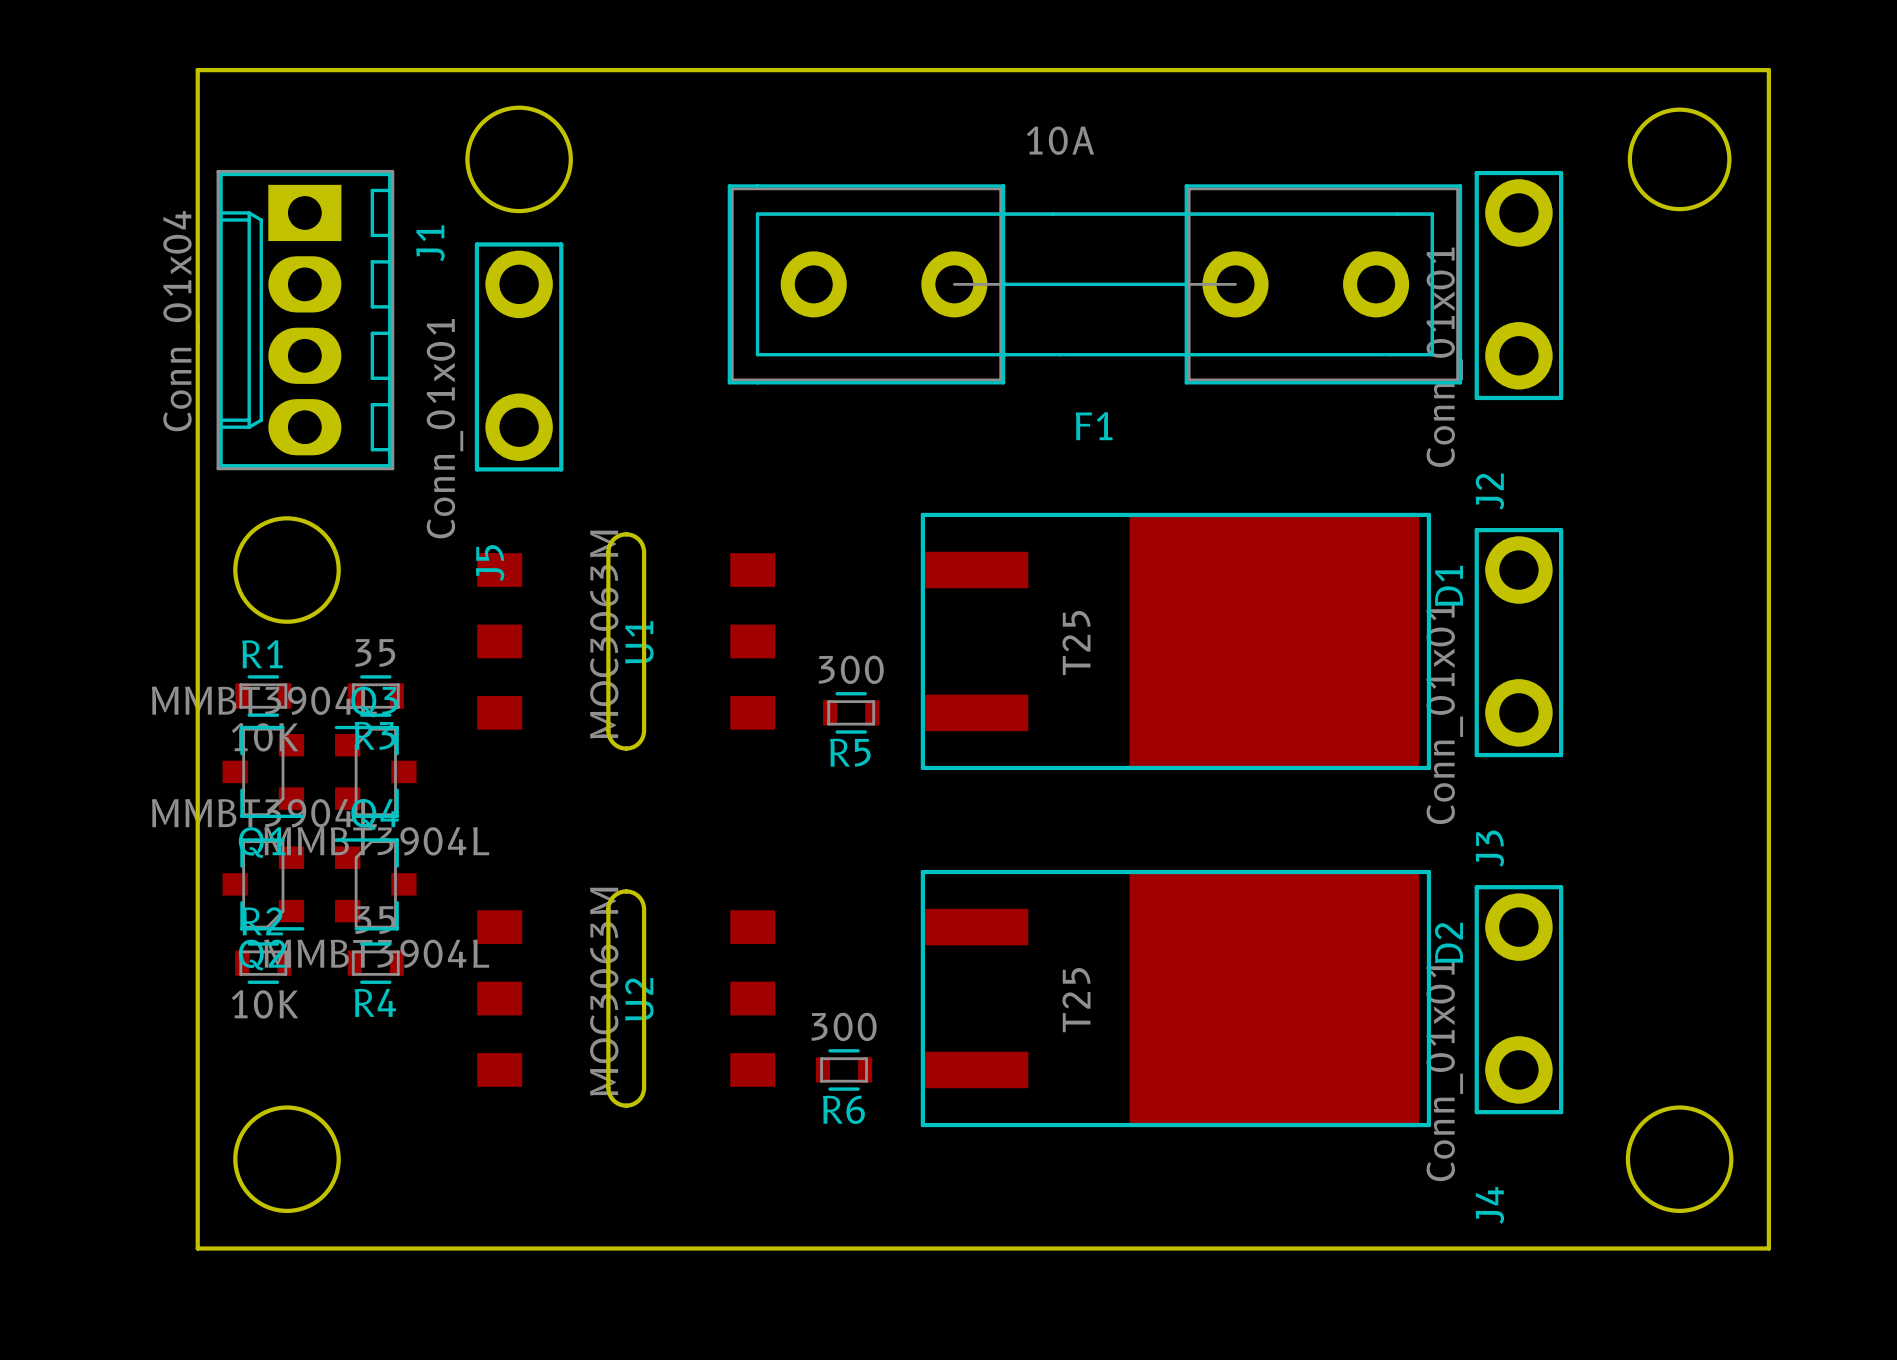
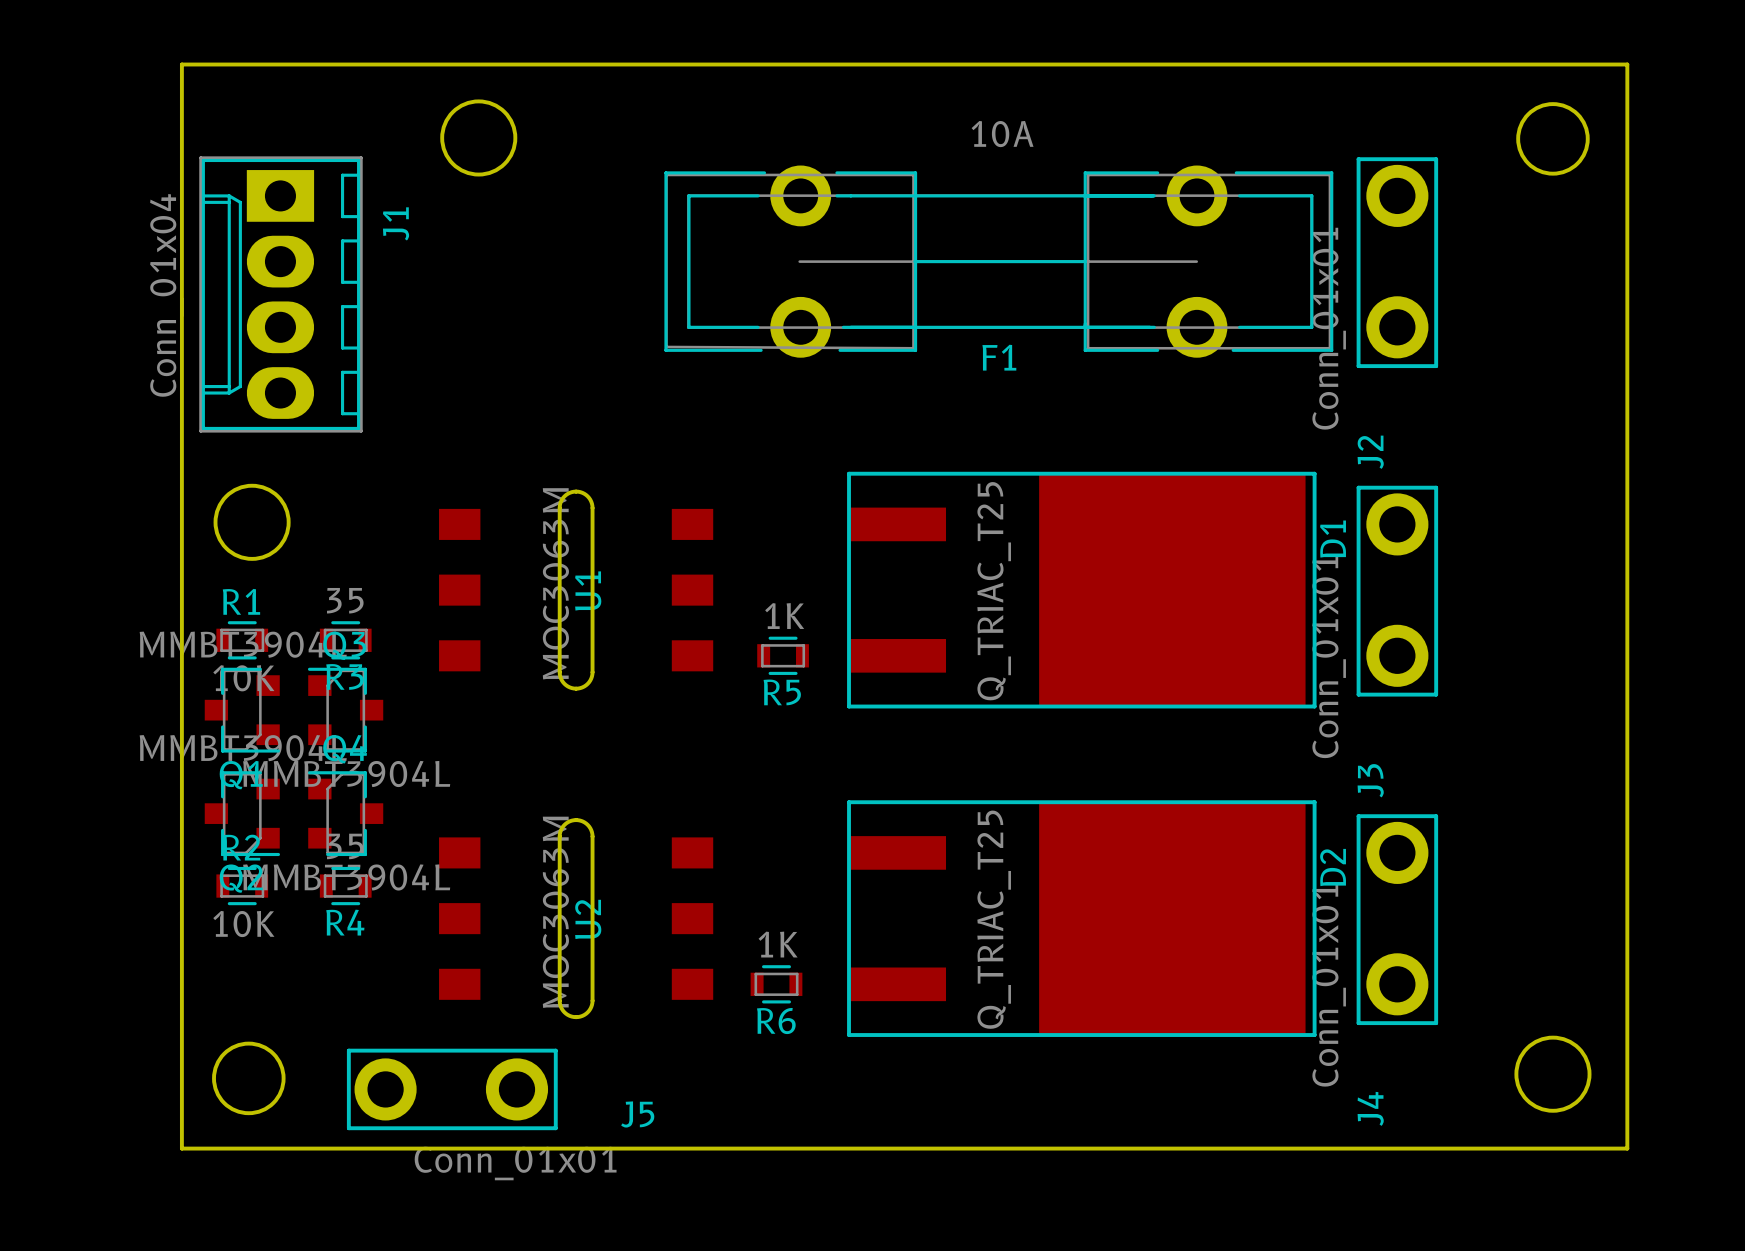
round board edge size: [465, 105, 573, 214] -> [440, 99, 518, 177]
round board edge size: [1627, 107, 1732, 212] -> [1516, 102, 1590, 176]
F1 footprint: [727, 184, 1463, 385] -> [664, 165, 1334, 358]
J5 rotation: 0° (519, 356) -> 90° counterclockwise (452, 1089)
J5 position: (519, 356) -> (452, 1089)
round board edge size: [233, 516, 341, 624] -> [213, 483, 291, 561]
D1 value: T25 (1076, 643) -> Q_TRIAC_T25 (994, 591)
R5 value: 300 (851, 669) -> 1K (784, 616)
D2 value: T25 (1076, 1000) -> Q_TRIAC_T25 (994, 919)
R6 value: 300 (844, 1026) -> 1K (778, 944)
round board edge size: [233, 1105, 341, 1214] -> [212, 1041, 286, 1116]
round board edge size: [1625, 1105, 1734, 1214] -> [1514, 1035, 1592, 1113]

